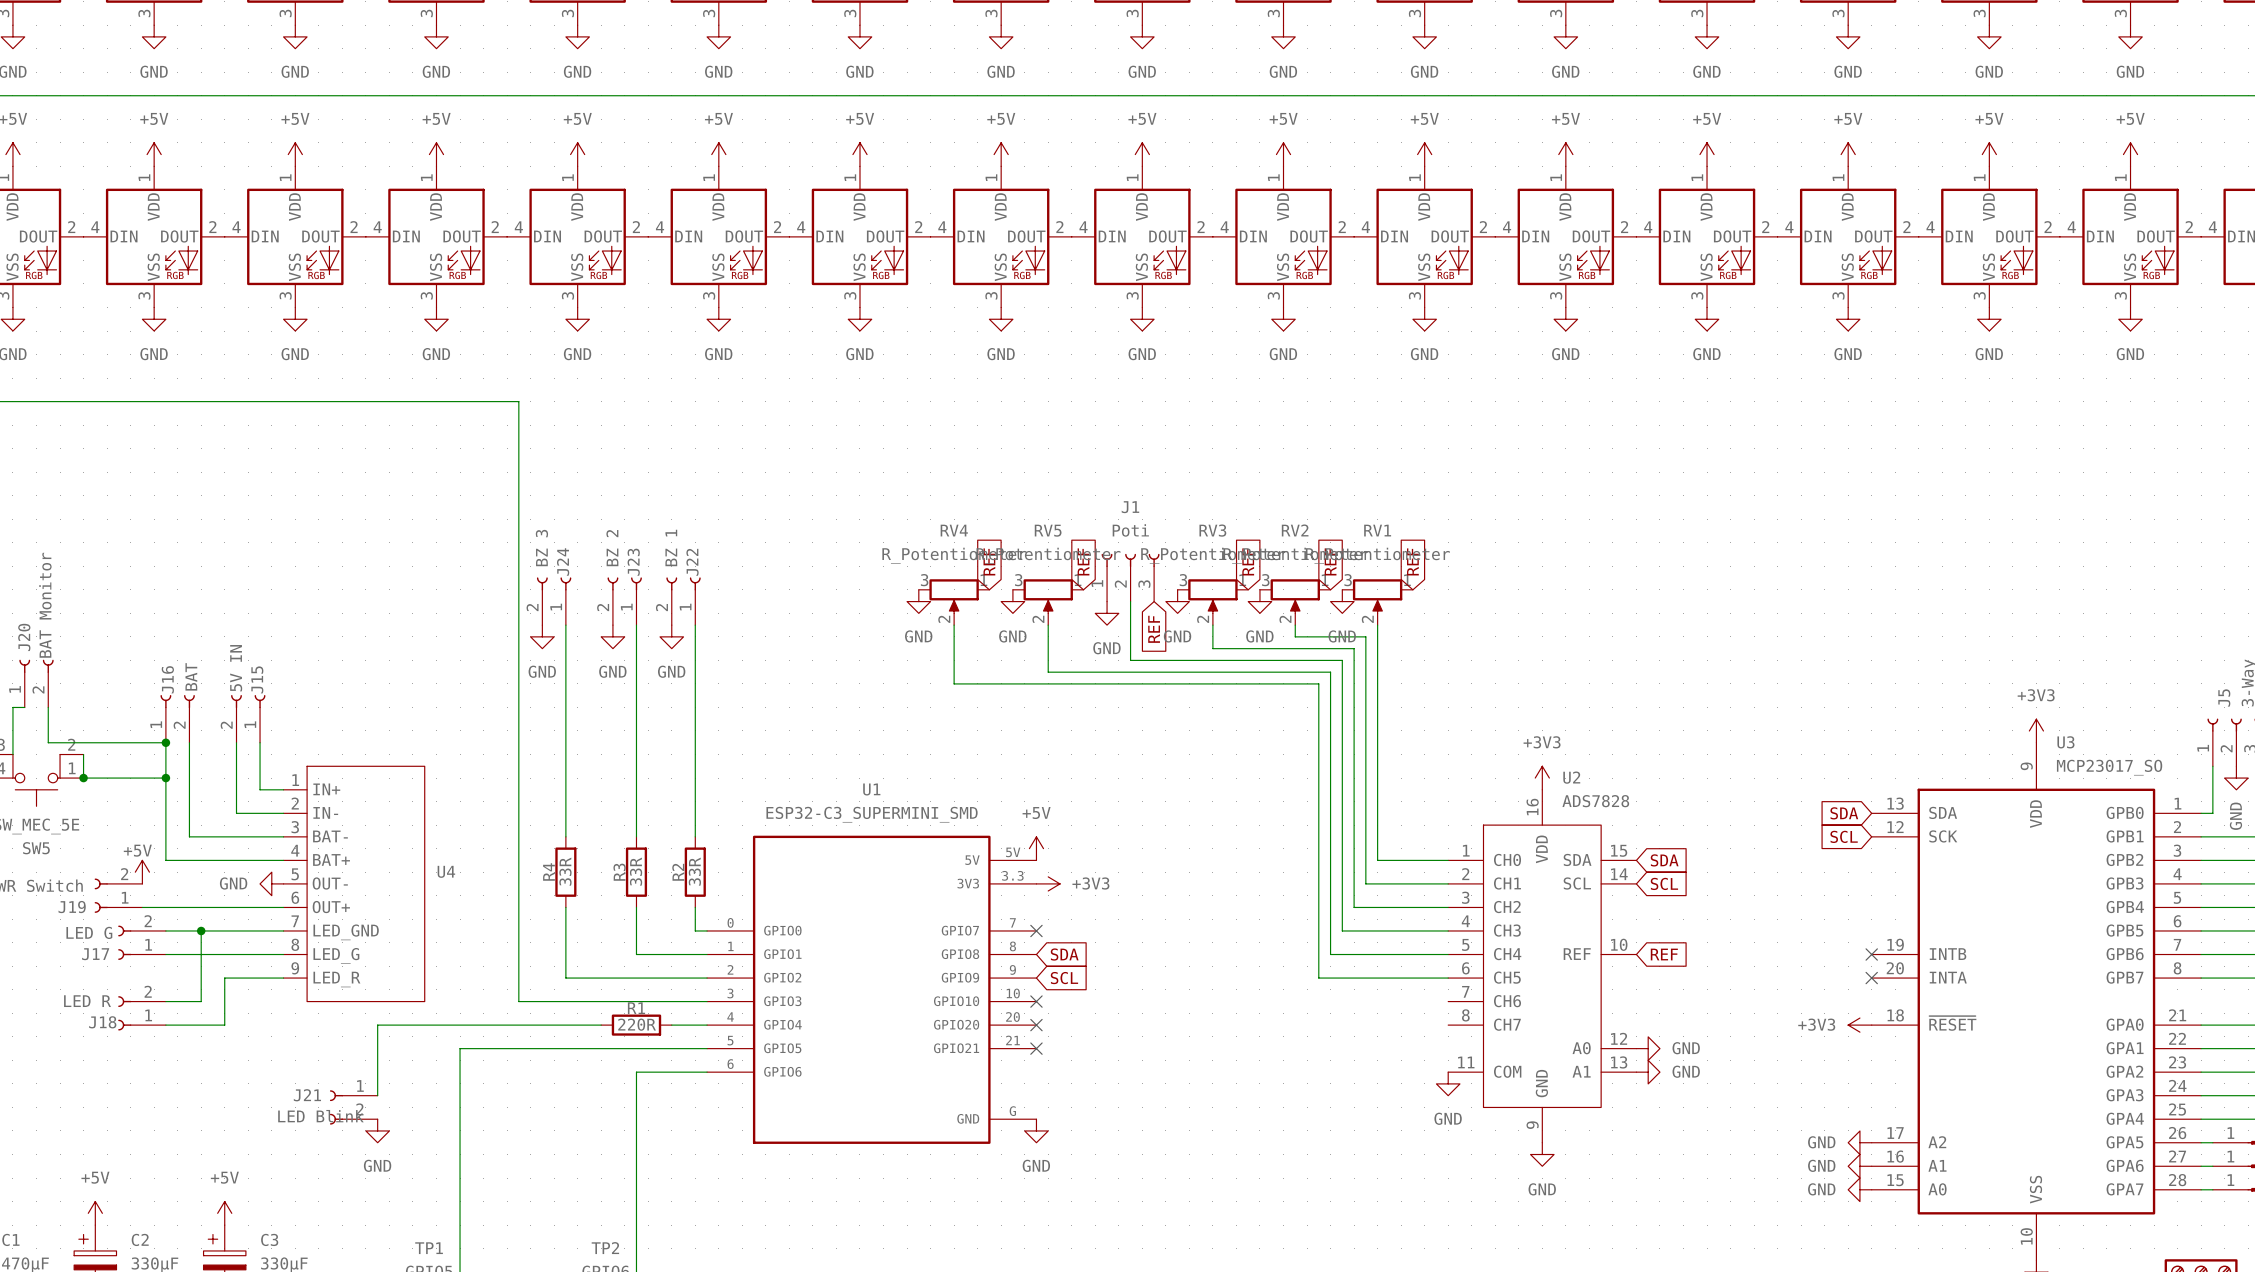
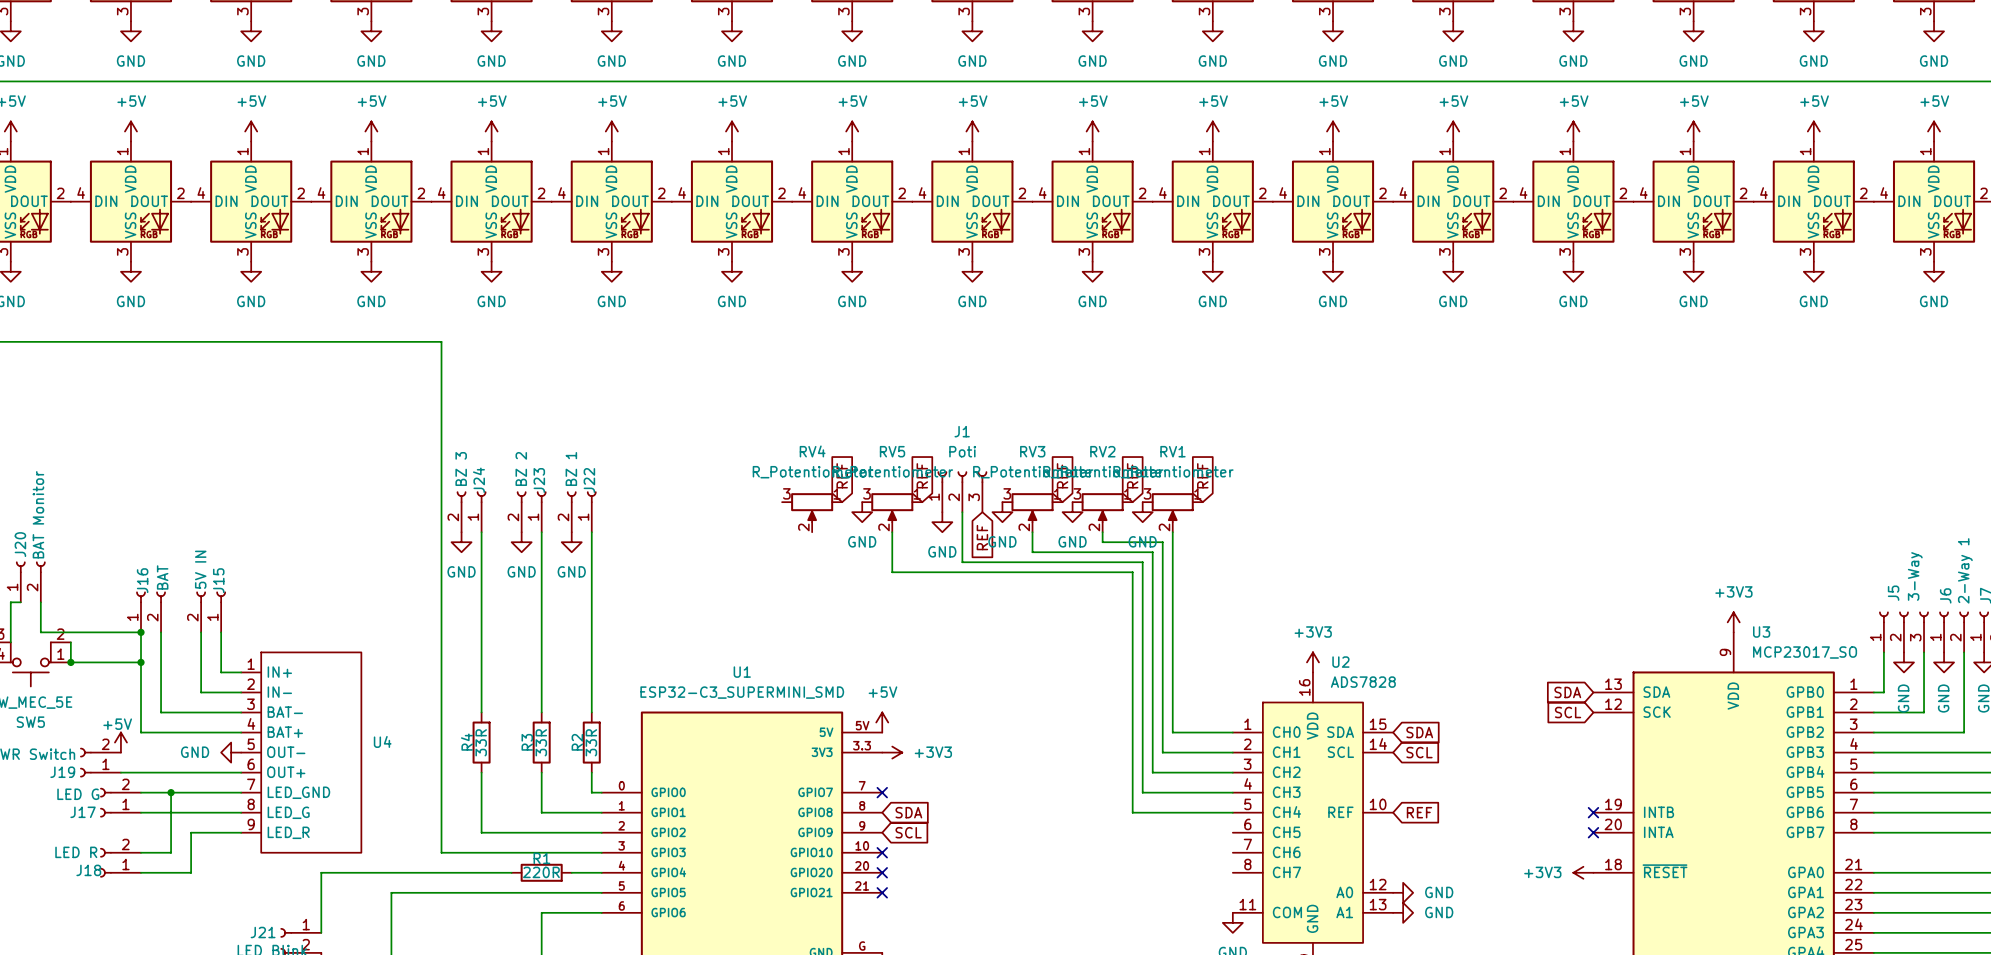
power symbol: GND (918, 601) -> none
wire: (954, 625) (954, 683) (1318, 683) (1318, 978) (1448, 978) -> none

